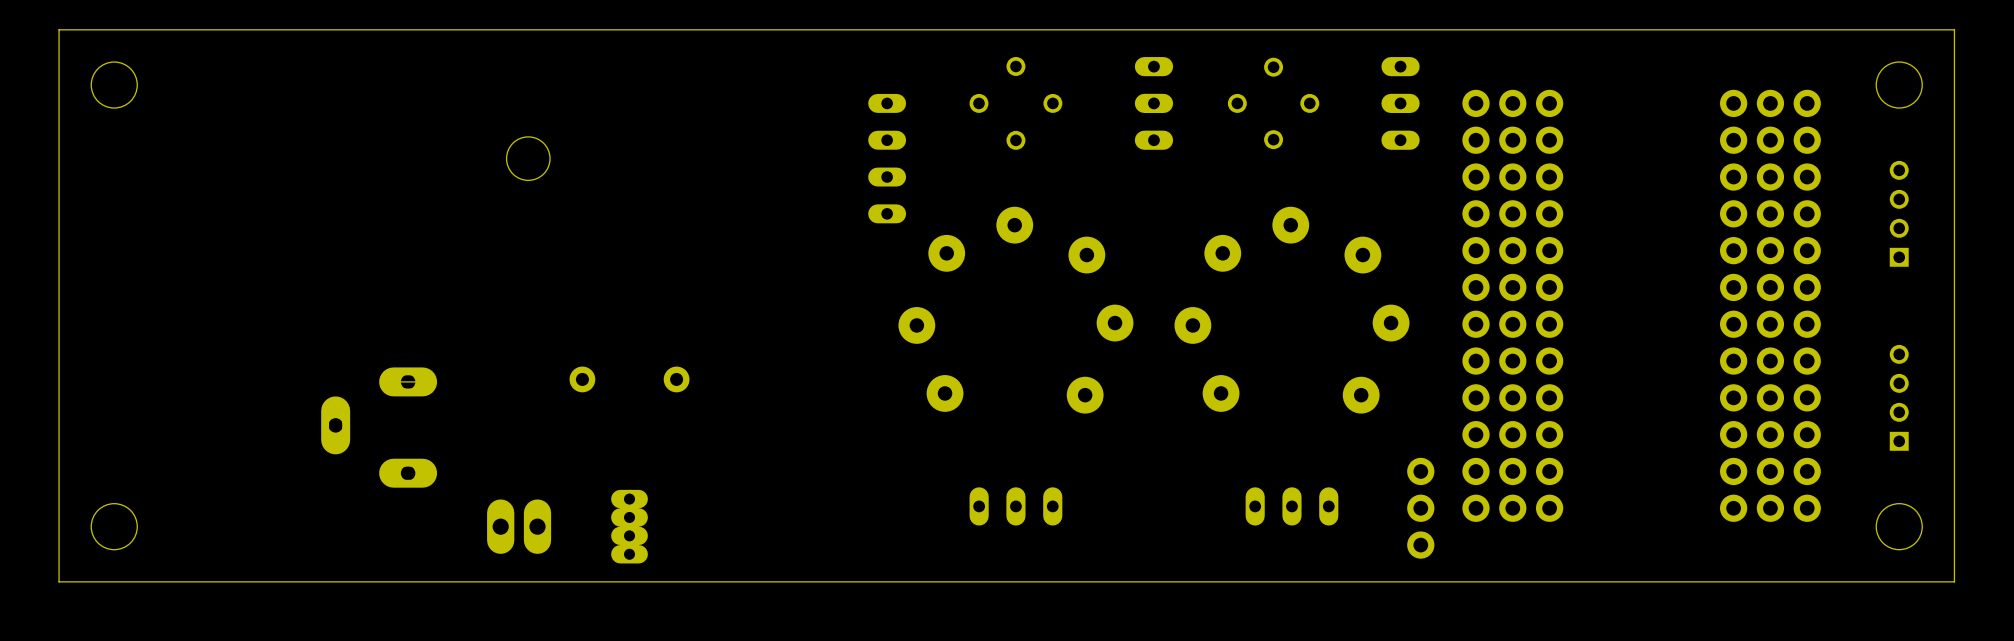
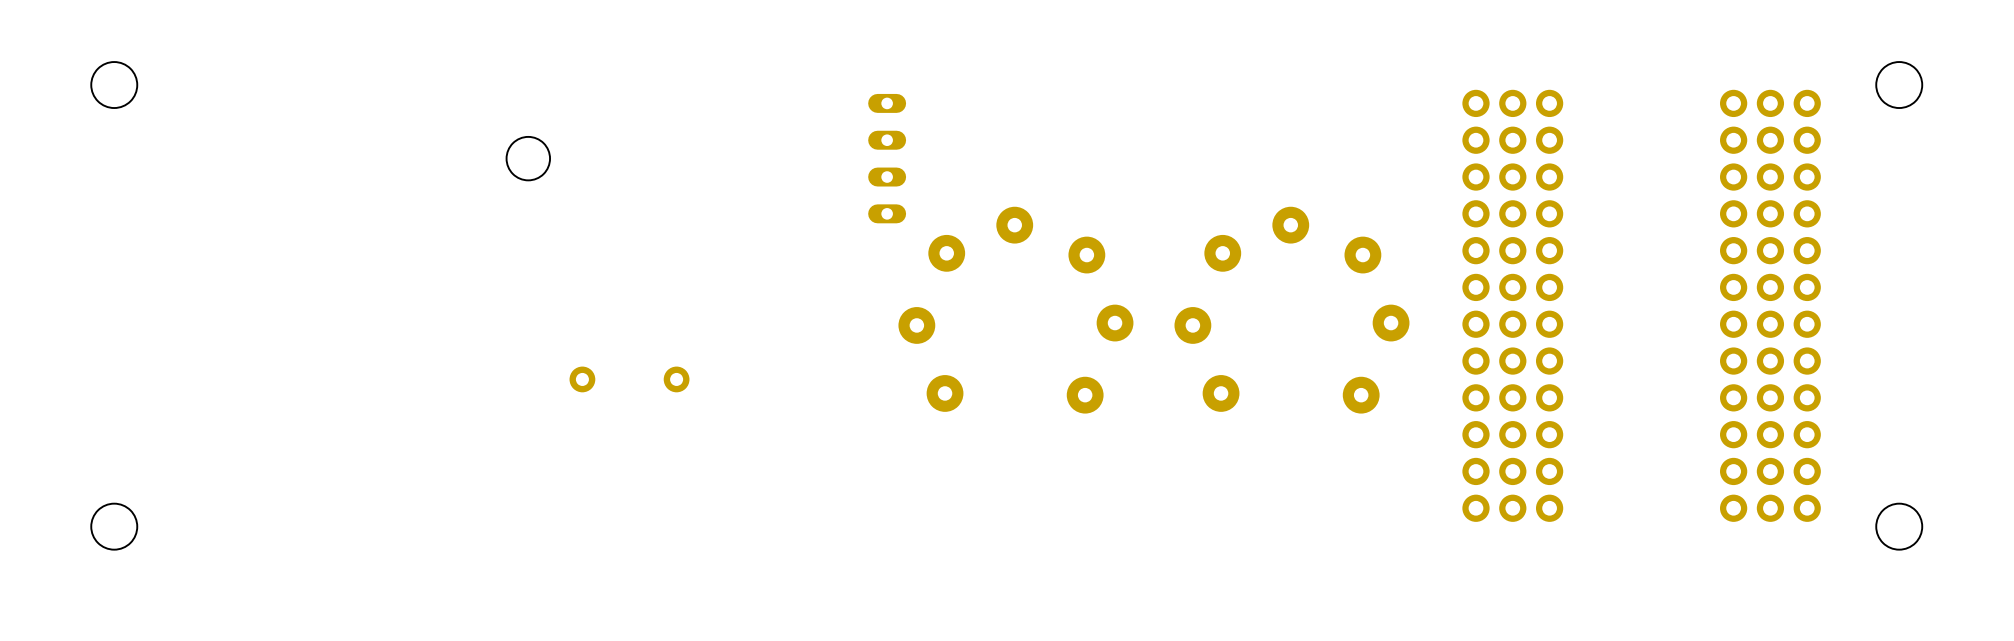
board edge: (1954, 29) (1954, 581) (59, 581) (59, 29) (1954, 29) -> none
part: (1015, 103) -> none
part: (1153, 103) -> none
part: (1273, 103) -> none
part: (1400, 103) -> none
part: (1899, 213) -> none
part: (1899, 397) -> none
part: (379, 427) -> none
part: (1015, 506) -> none
part: (1291, 506) -> none
part: (1420, 508) -> none
part: (519, 526) -> none
part: (629, 526) -> none

